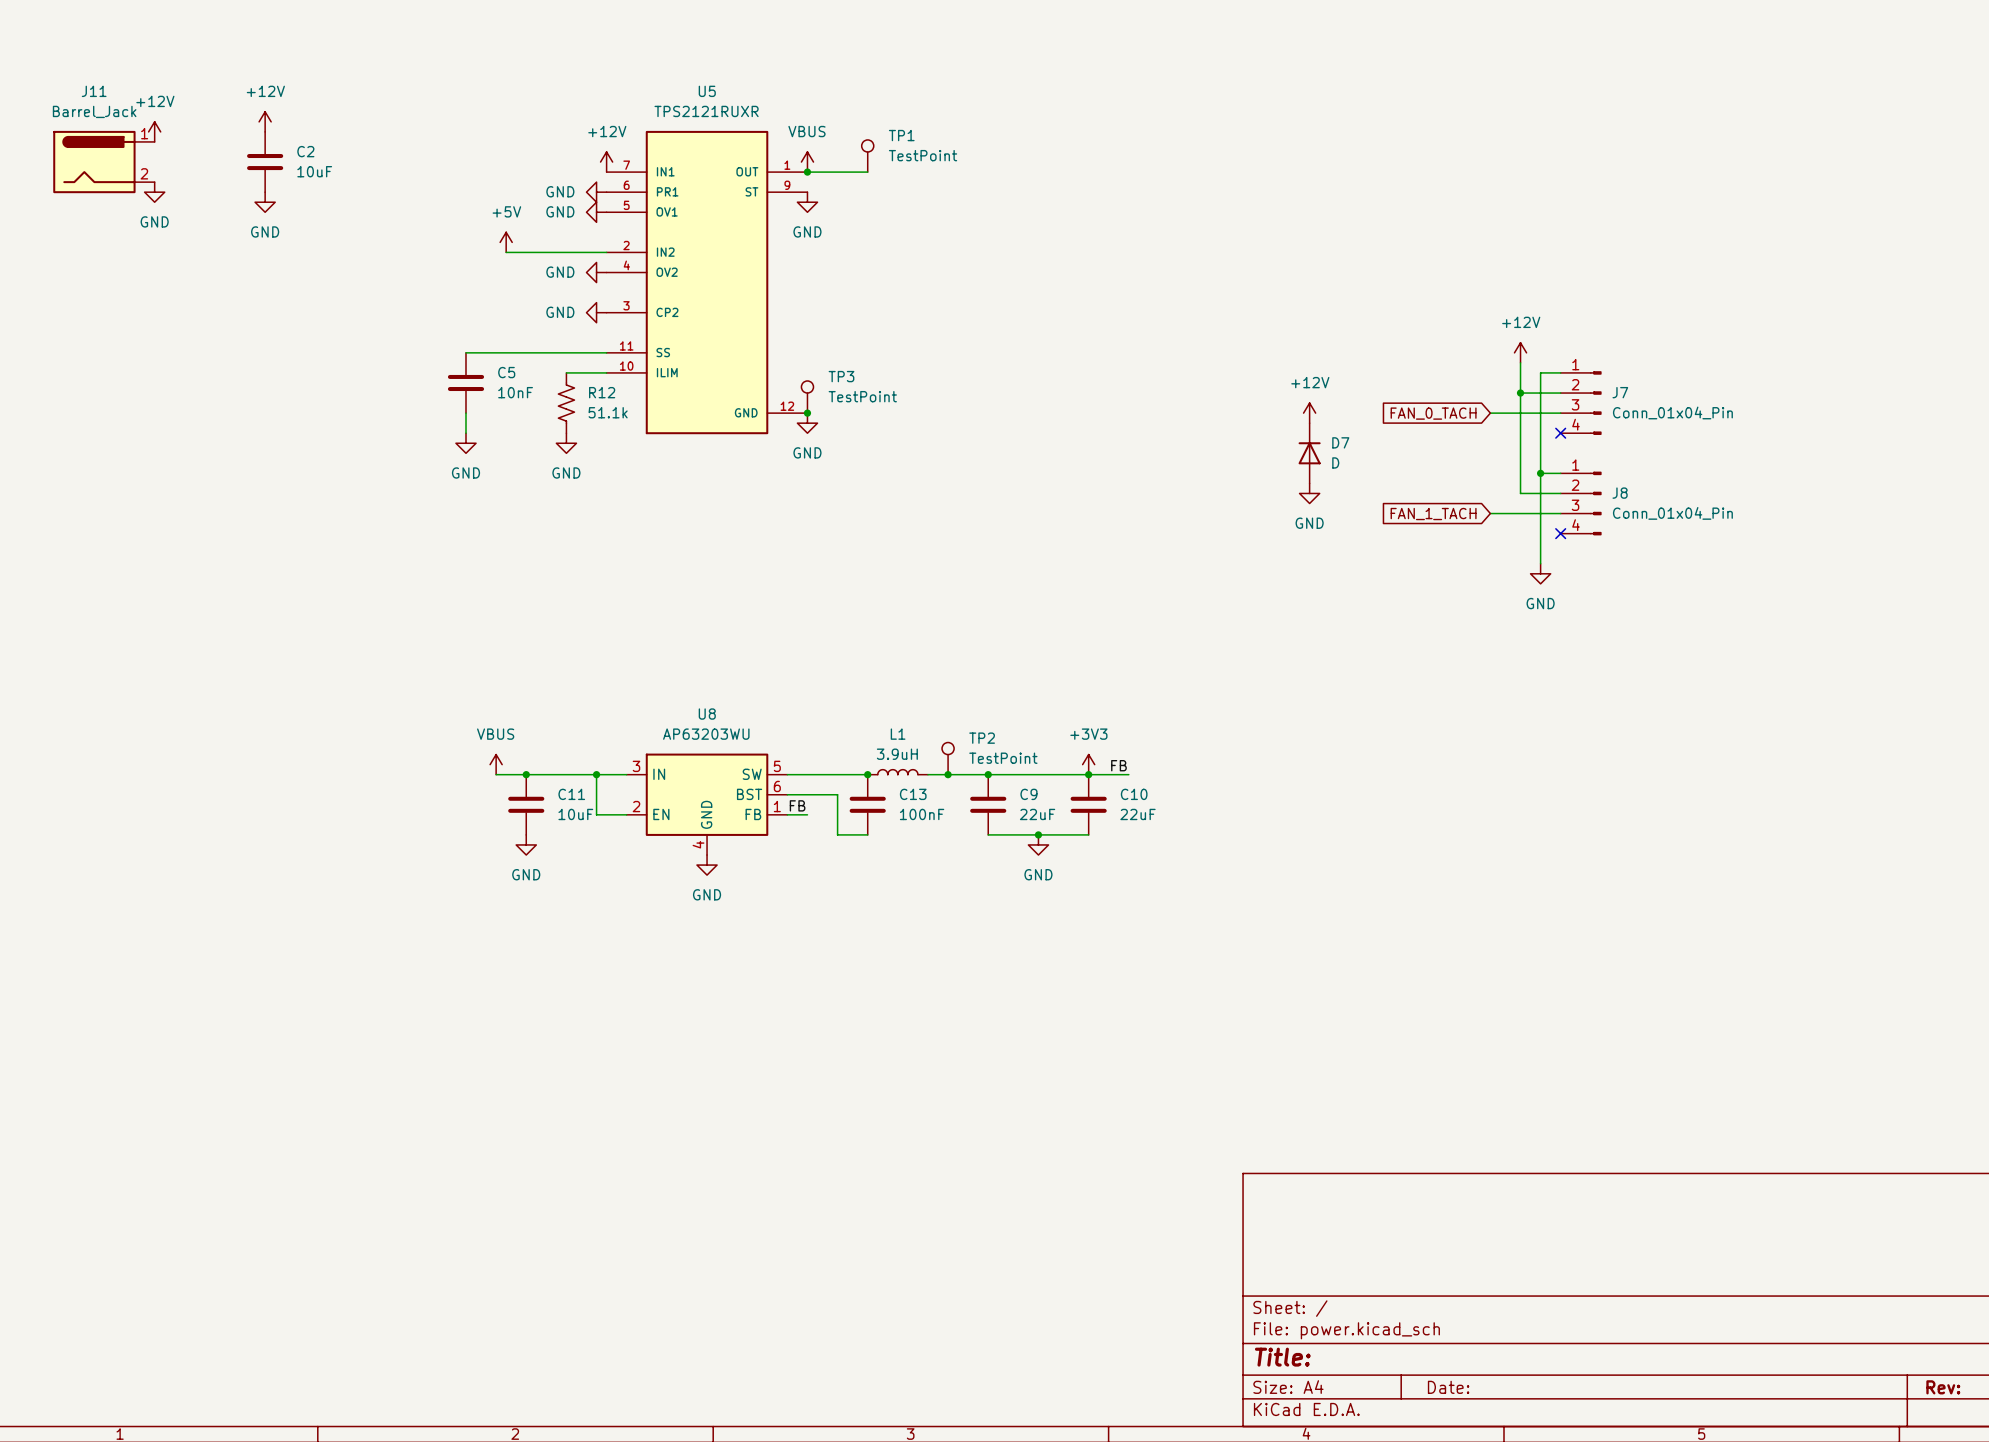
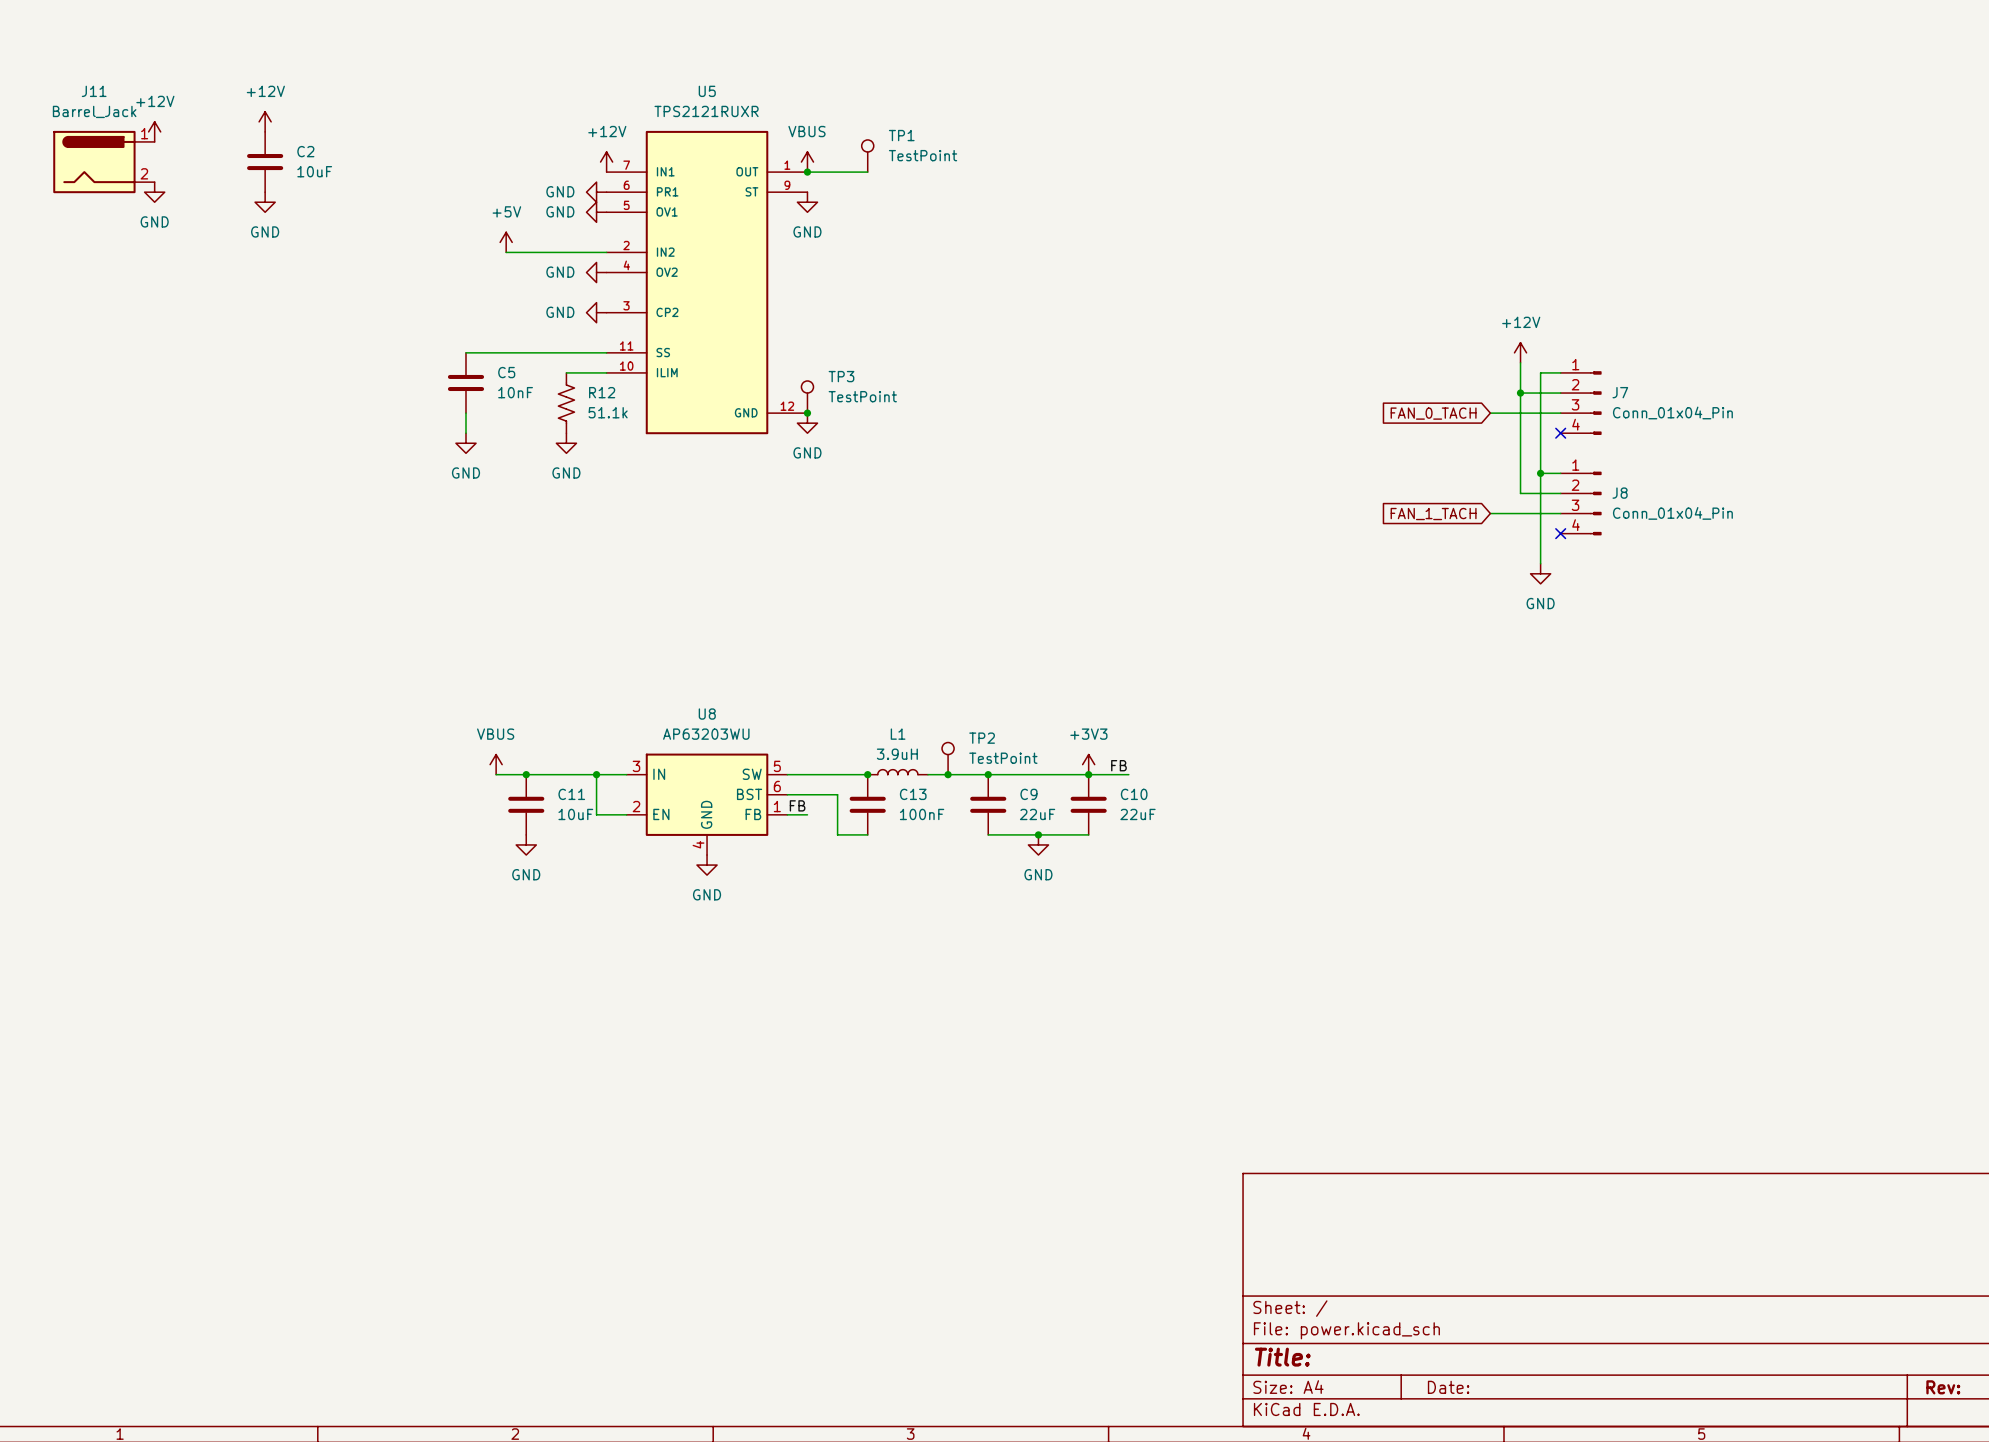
power symbol: +12V (1309, 413) -> none
D7: D (1309, 453) -> none
power symbol: GND (1309, 493) -> none

